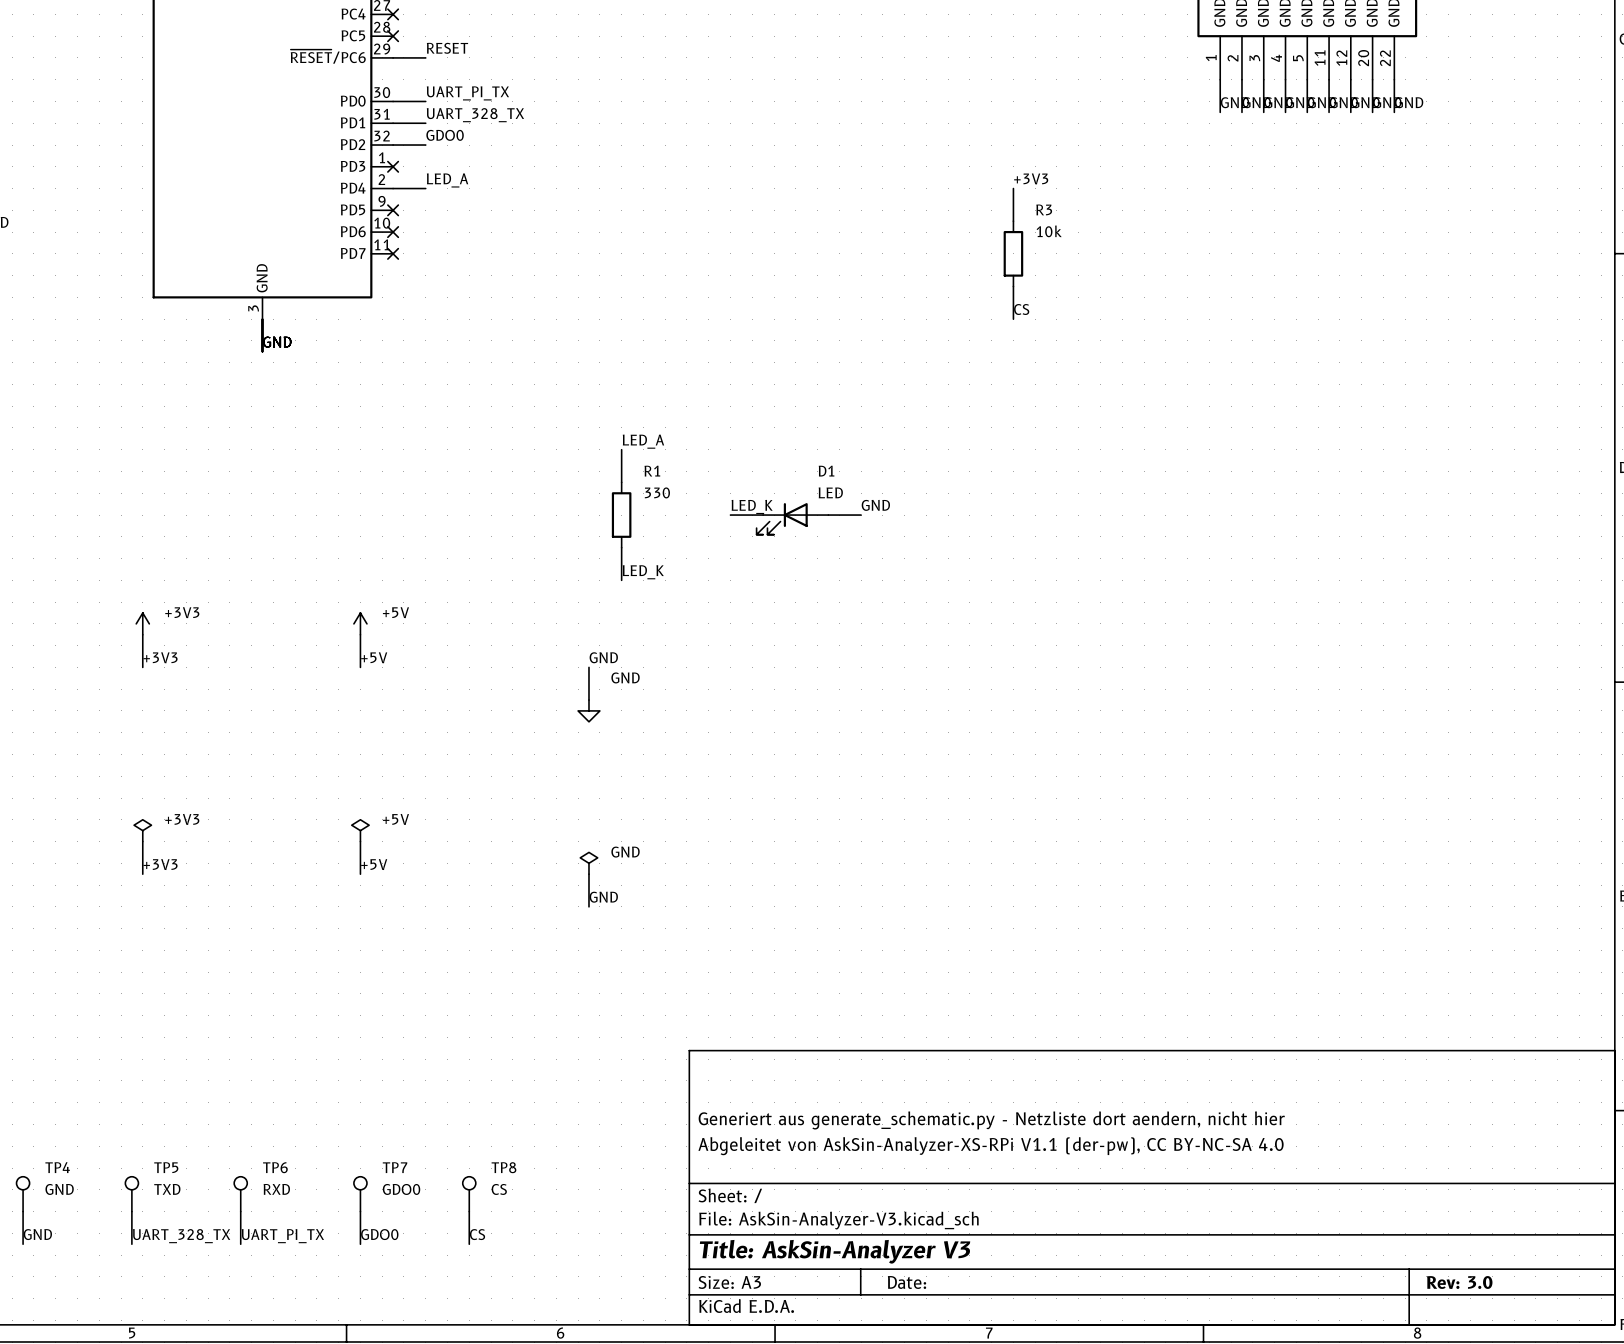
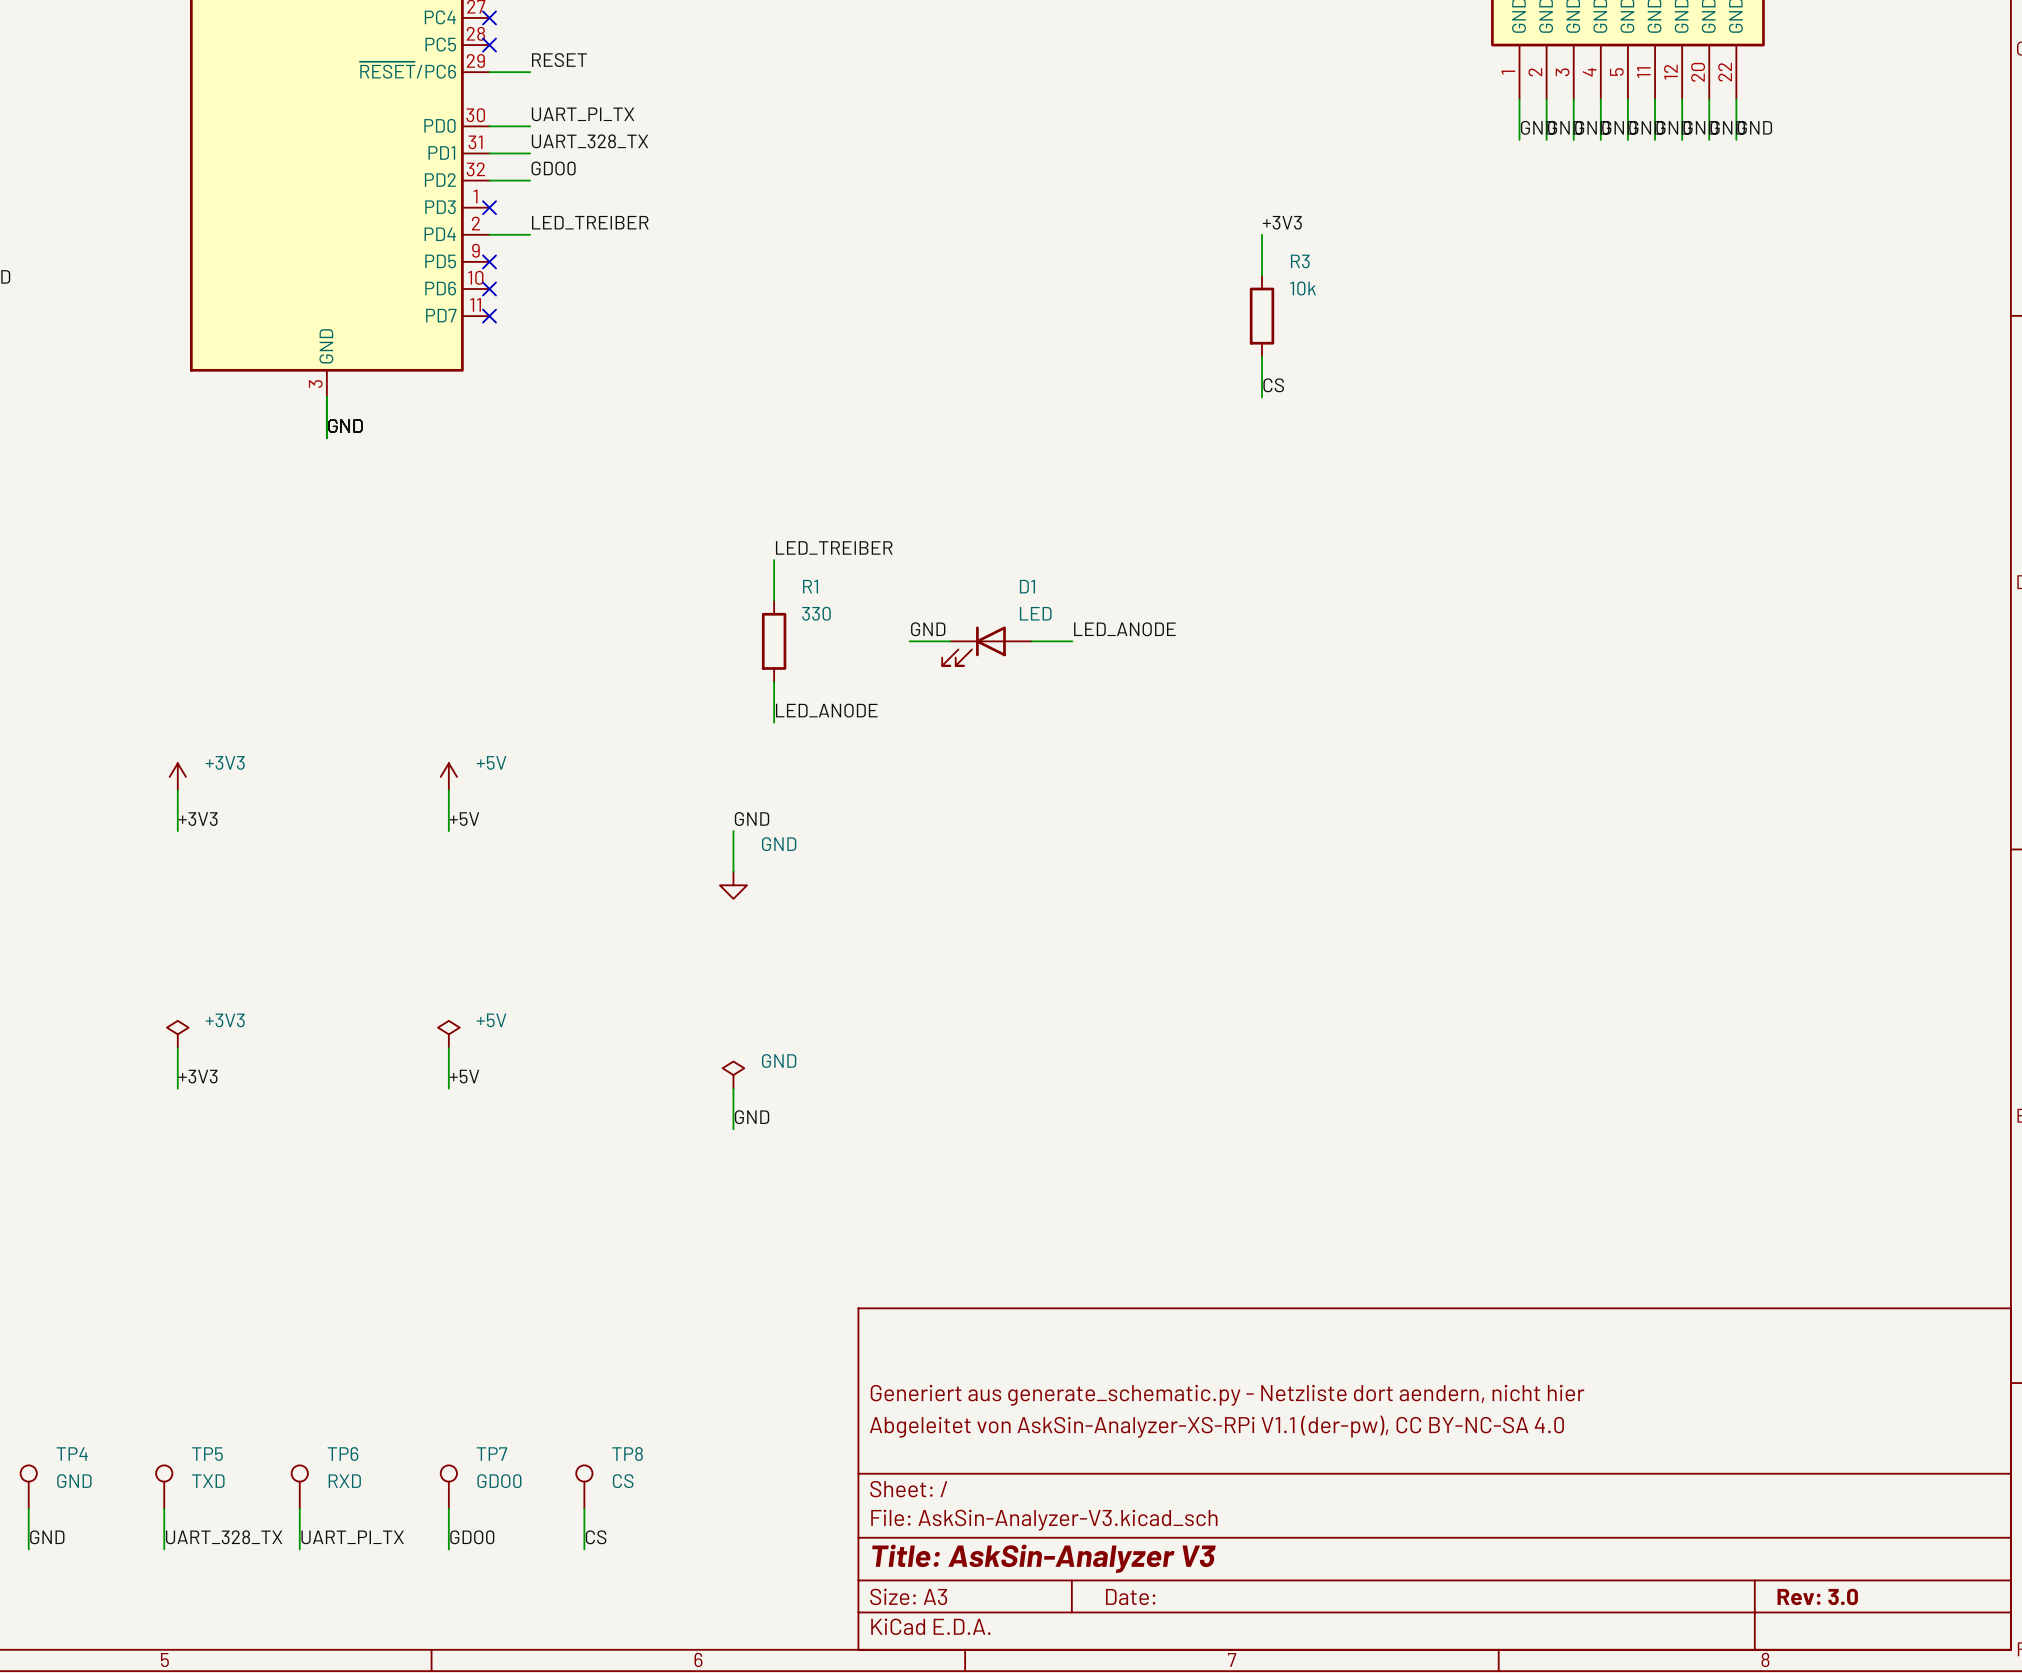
label: LED_A (447, 180) -> LED_TREIBER (590, 222)
label: LED_A (643, 441) -> LED_TREIBER (834, 547)
label: GND (875, 505) -> LED_ANODE (1124, 629)
label: LED_K (752, 506) -> GND (928, 629)
label: LED_K (643, 572) -> LED_ANODE (826, 710)

